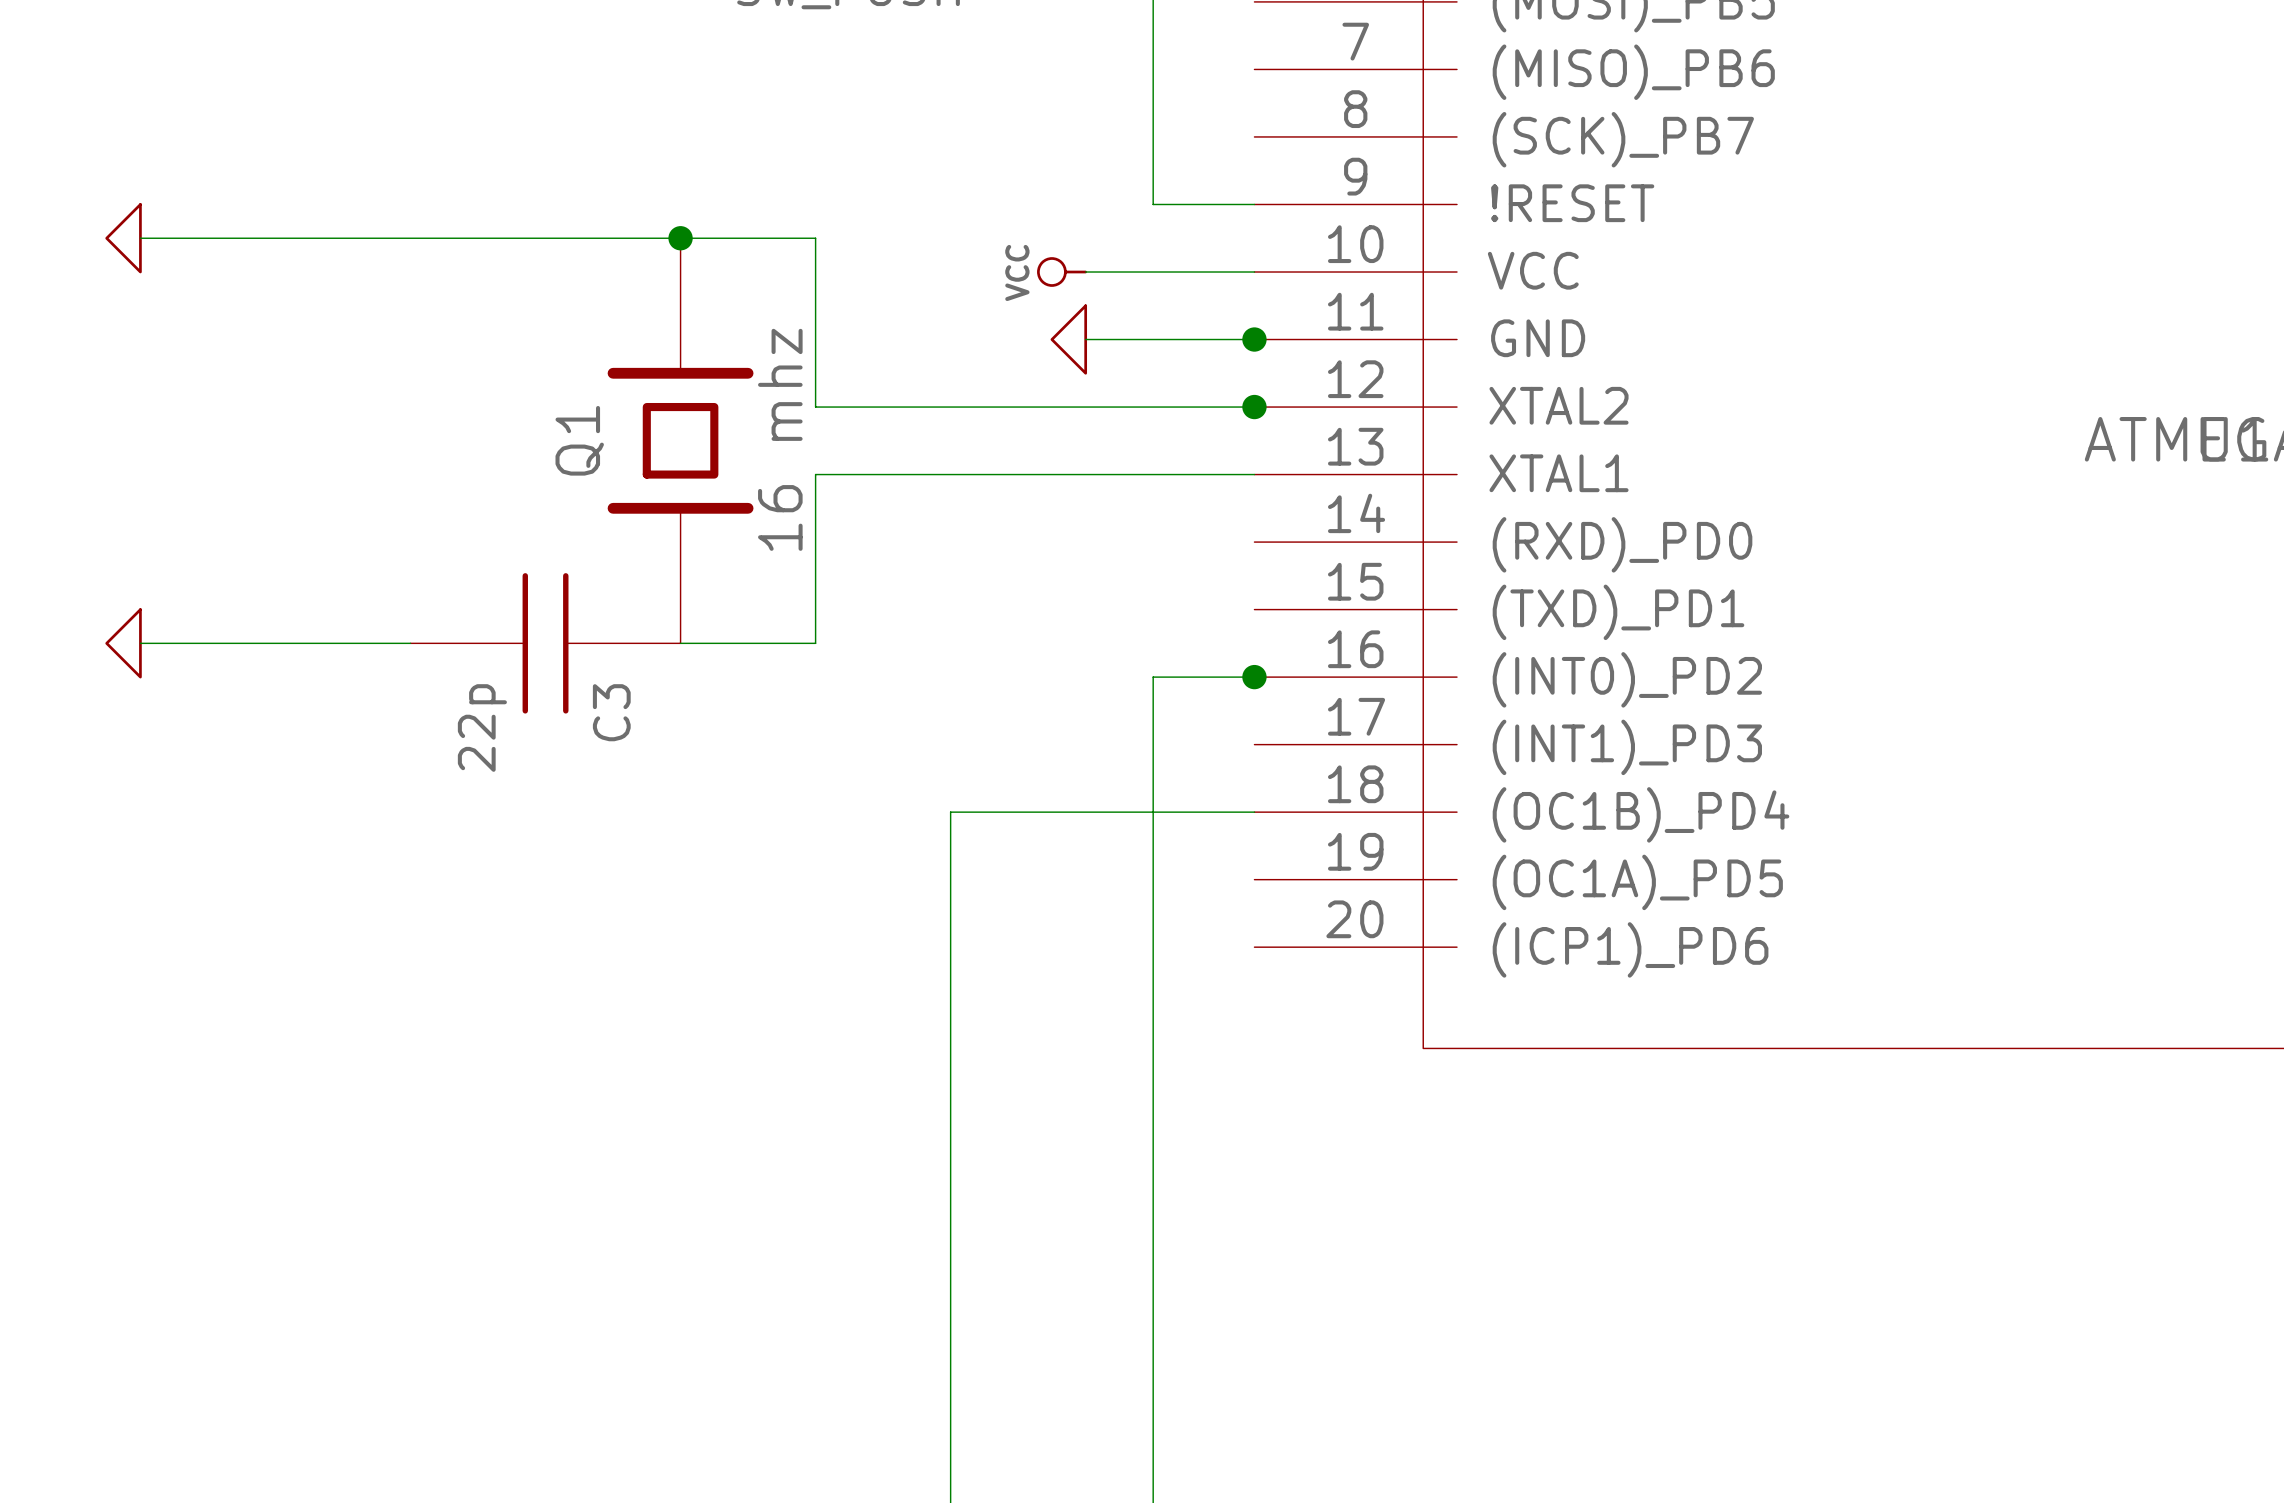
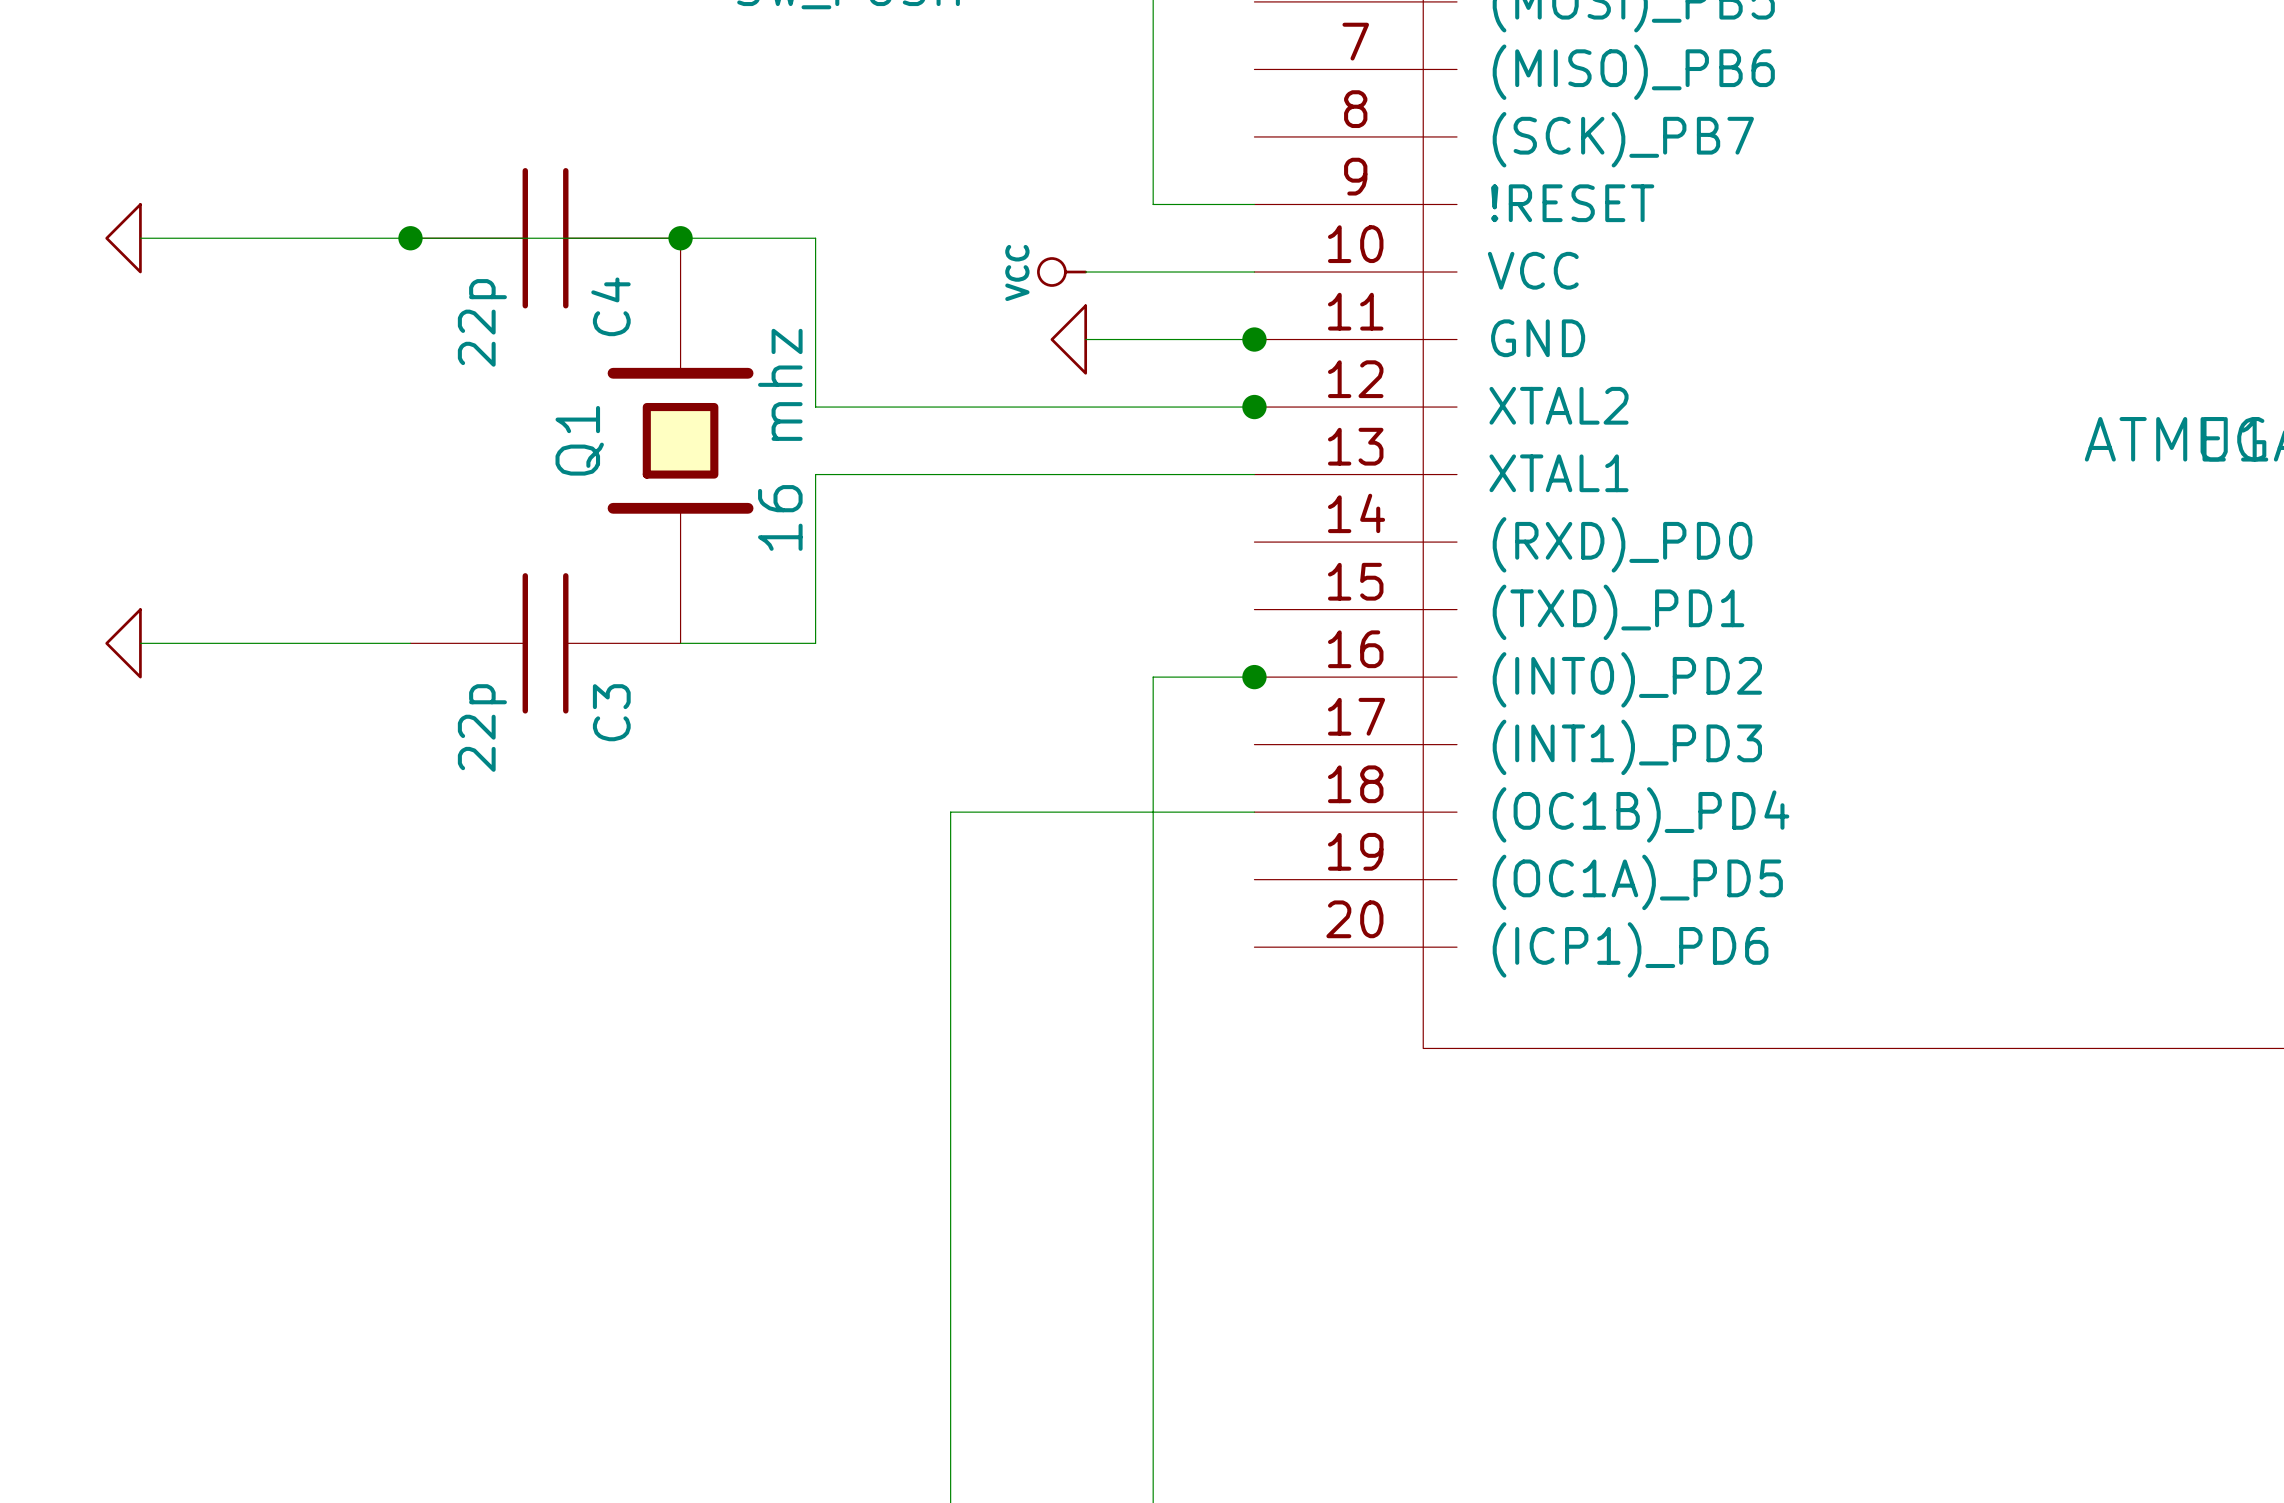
junction: none -> (410, 238)
C4: none -> 22p (545, 238)

